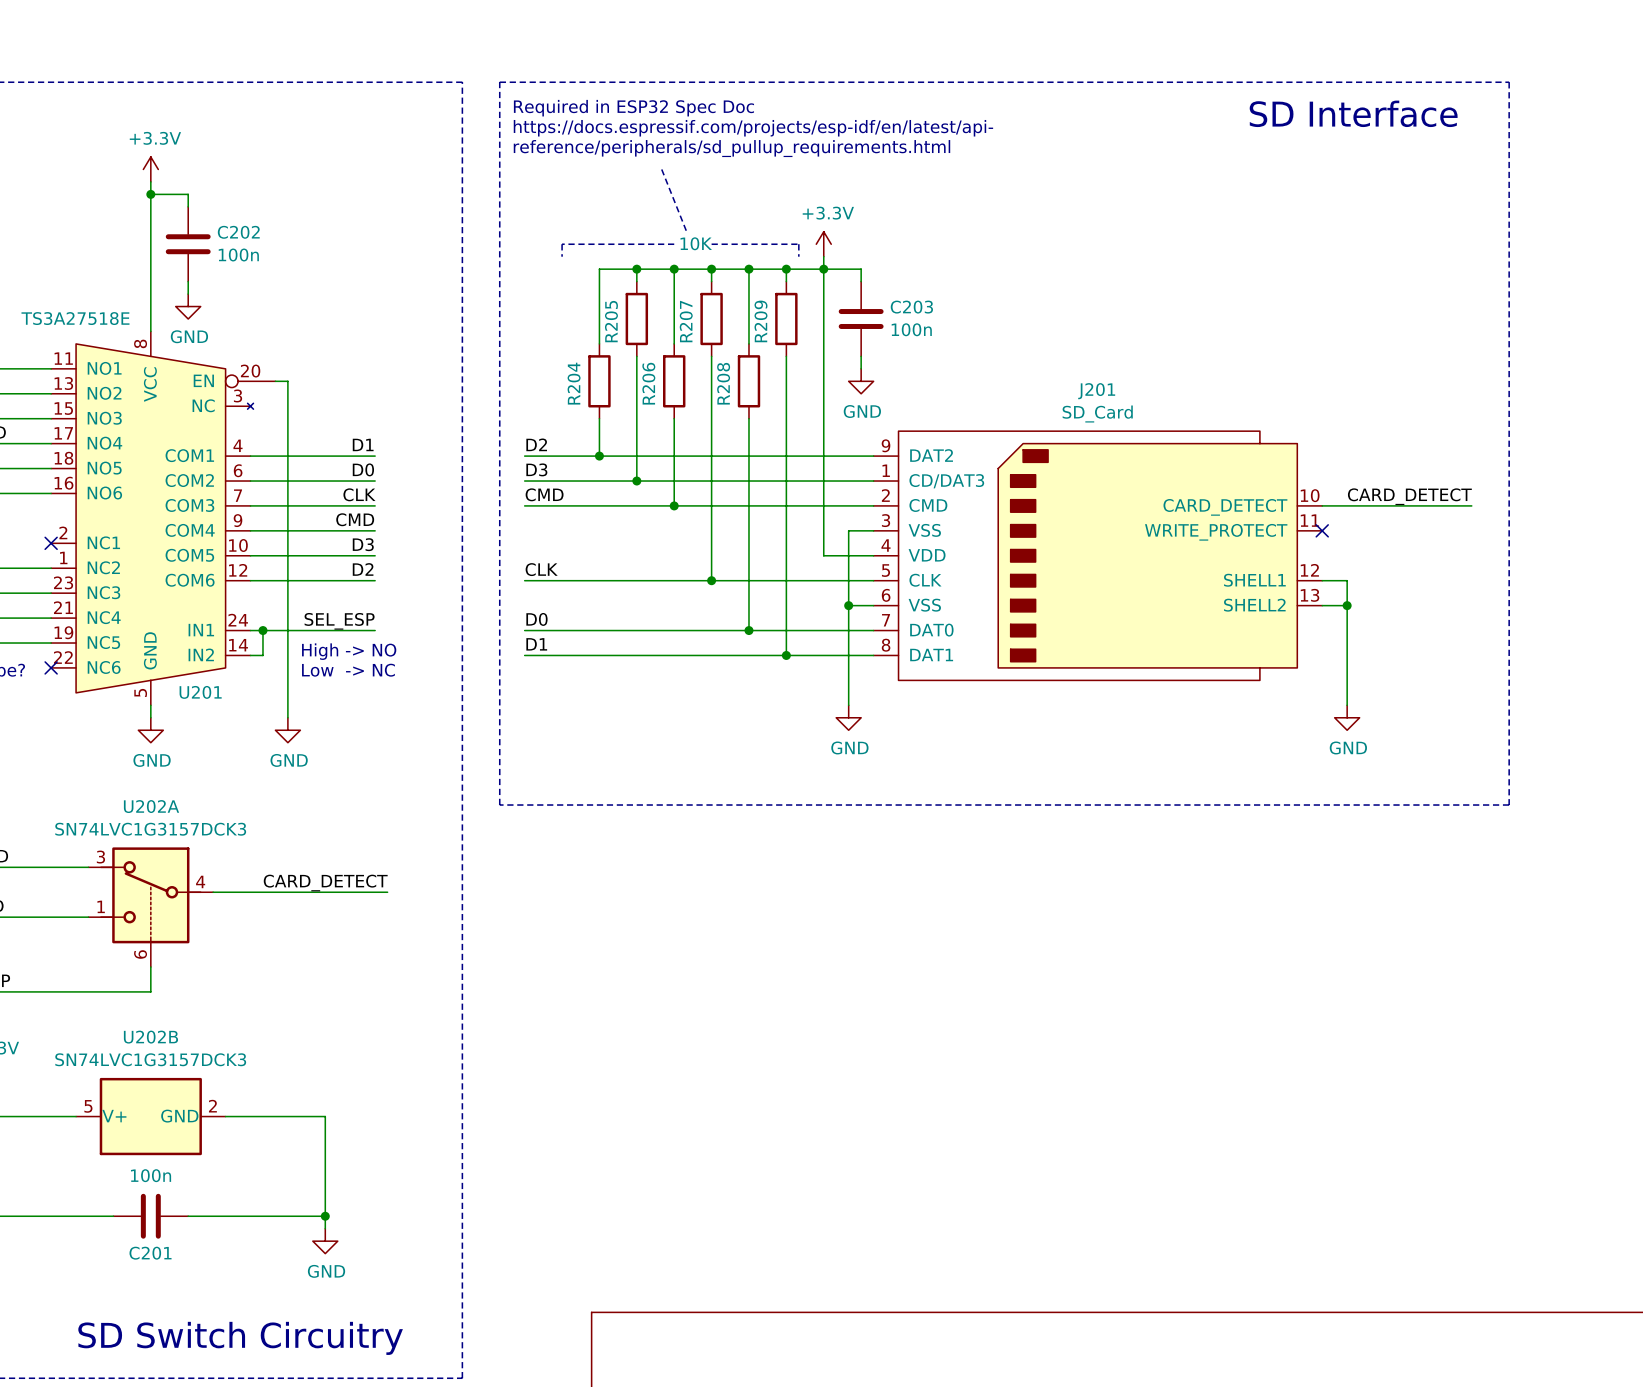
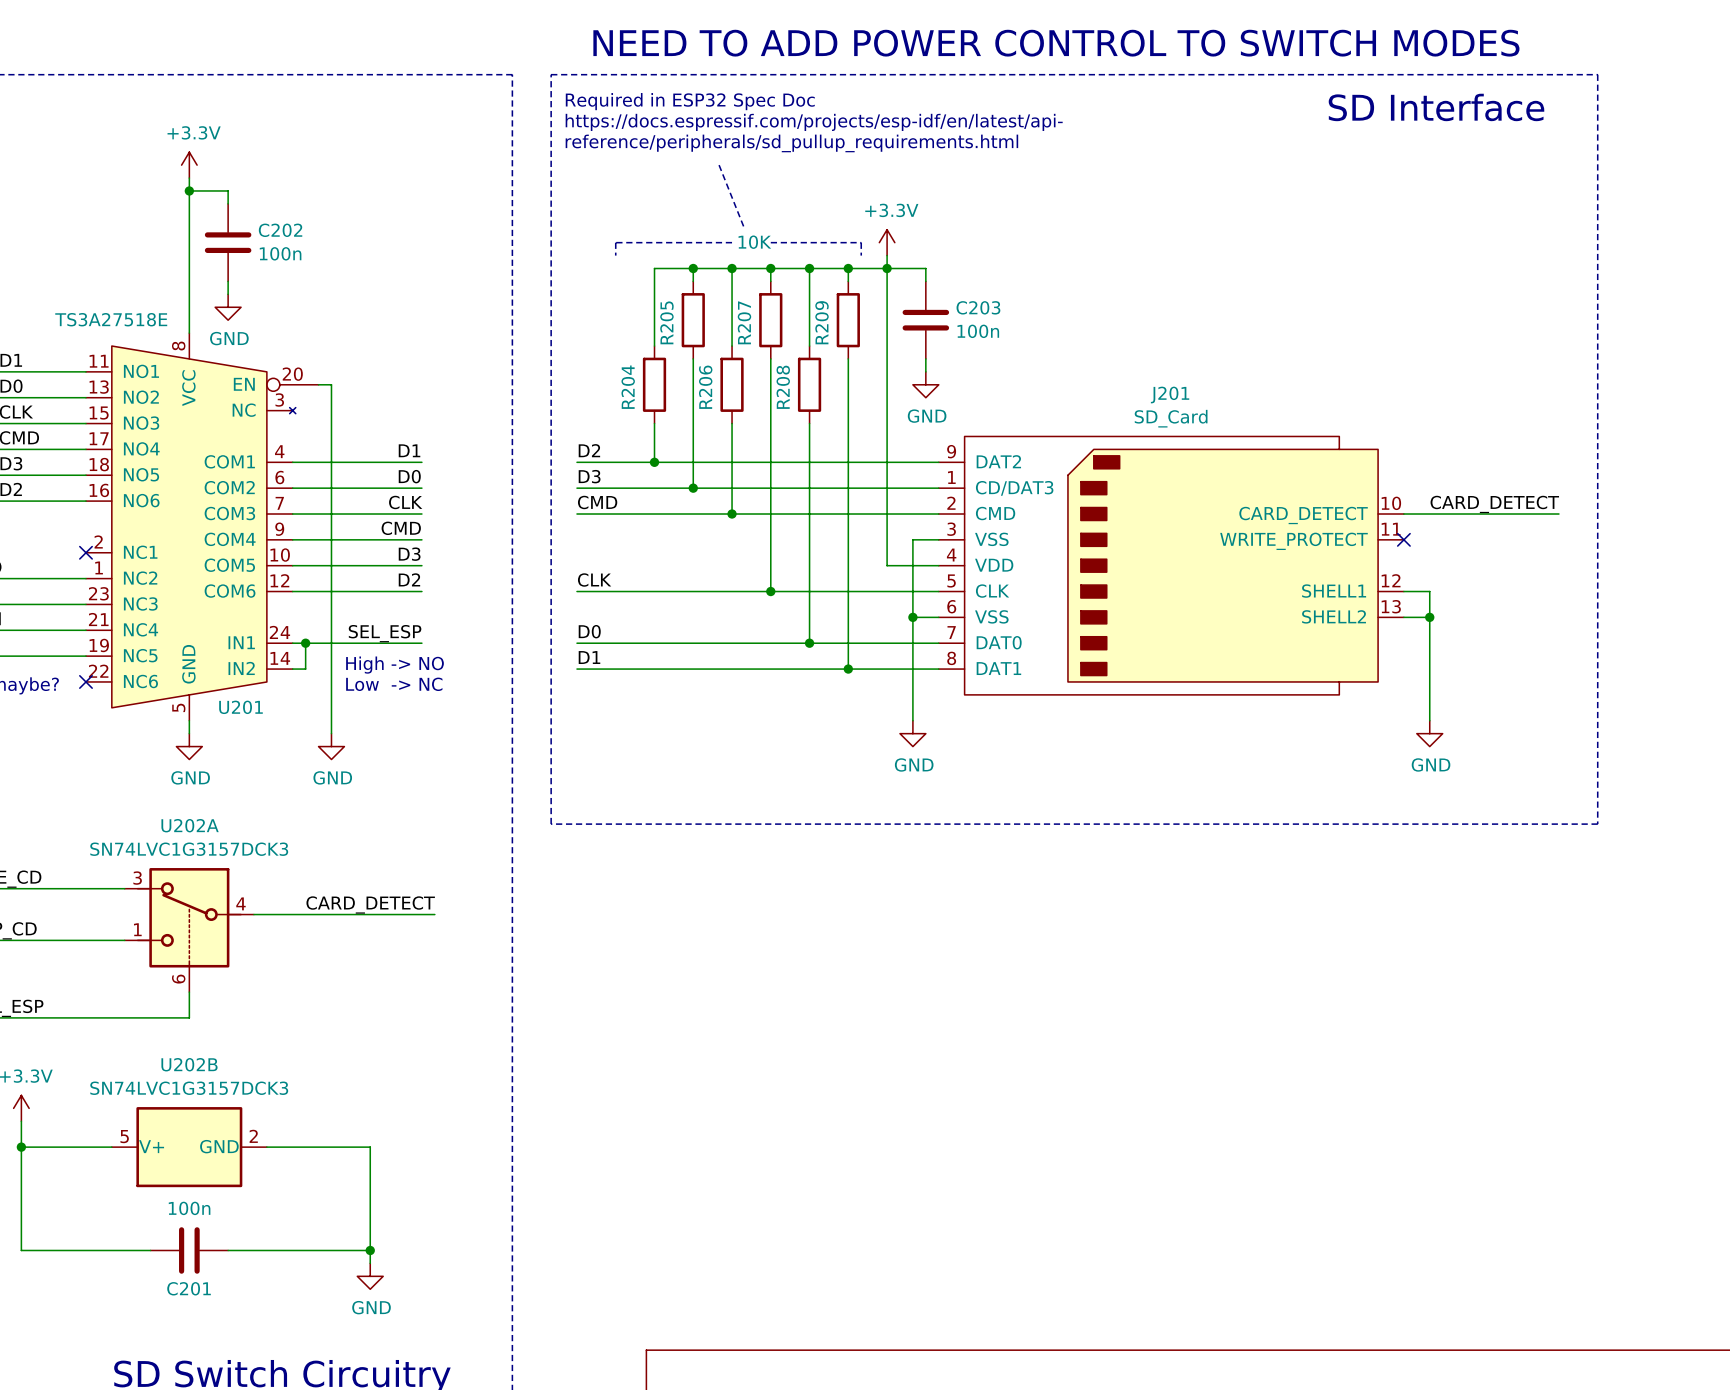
text: none -> NEED TO ADD POWER CONTROL TO SWITCH MODES (1056, 43)

